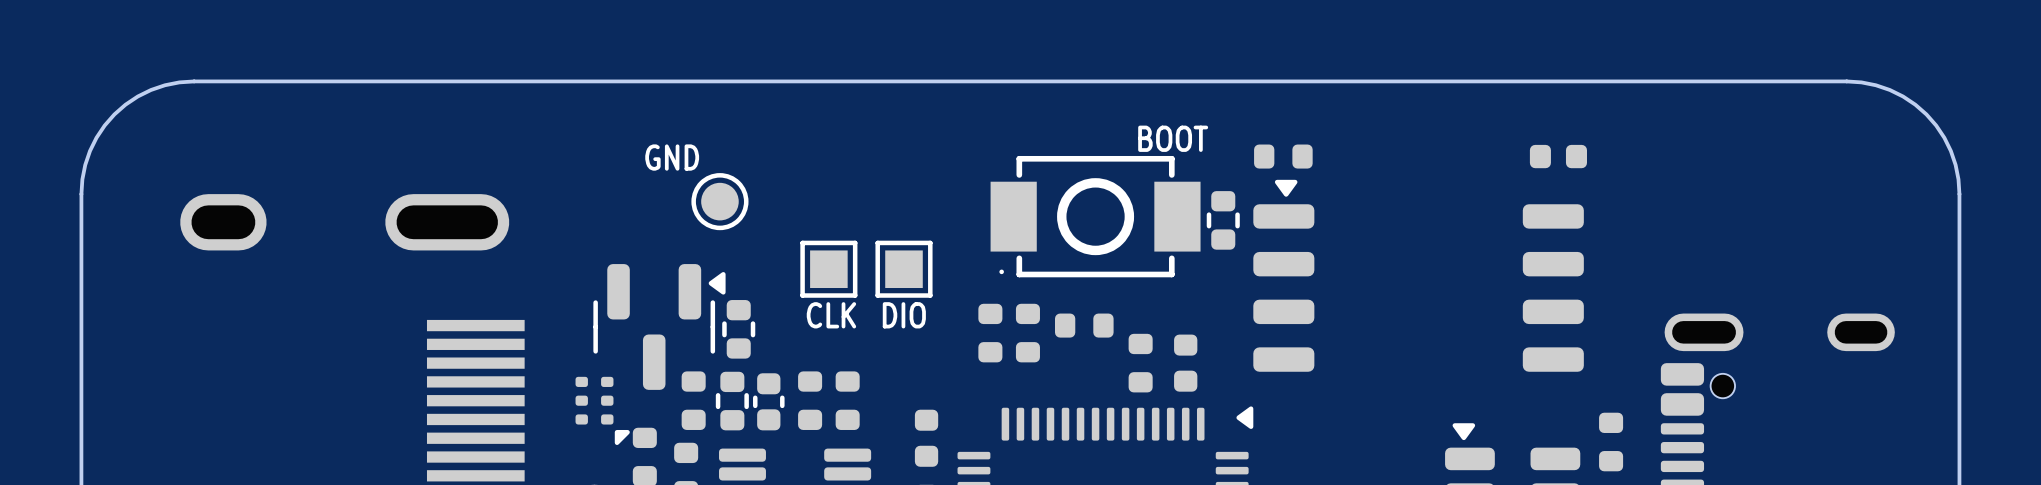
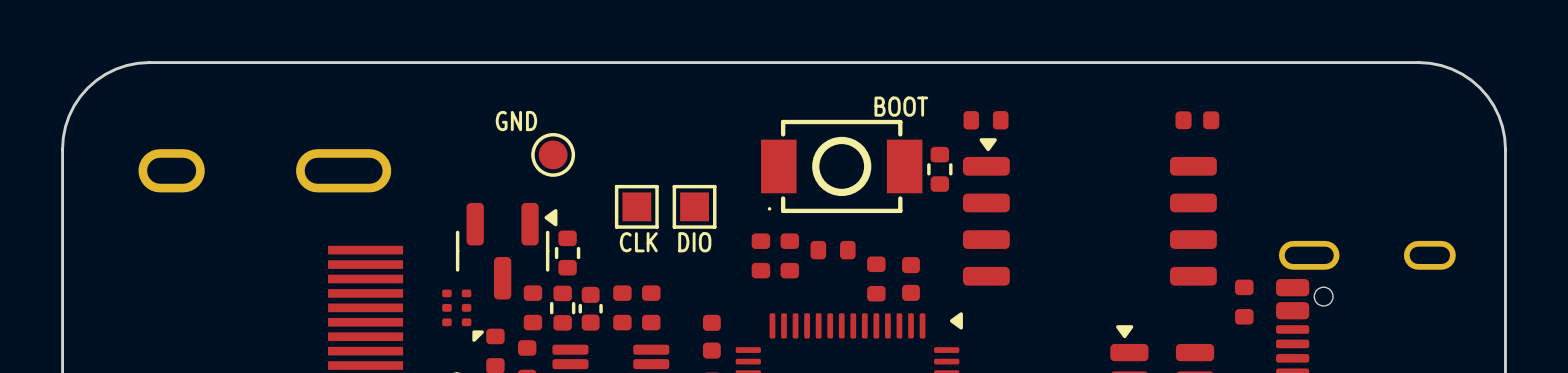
part position: (1611, 442) -> (1244, 302)

